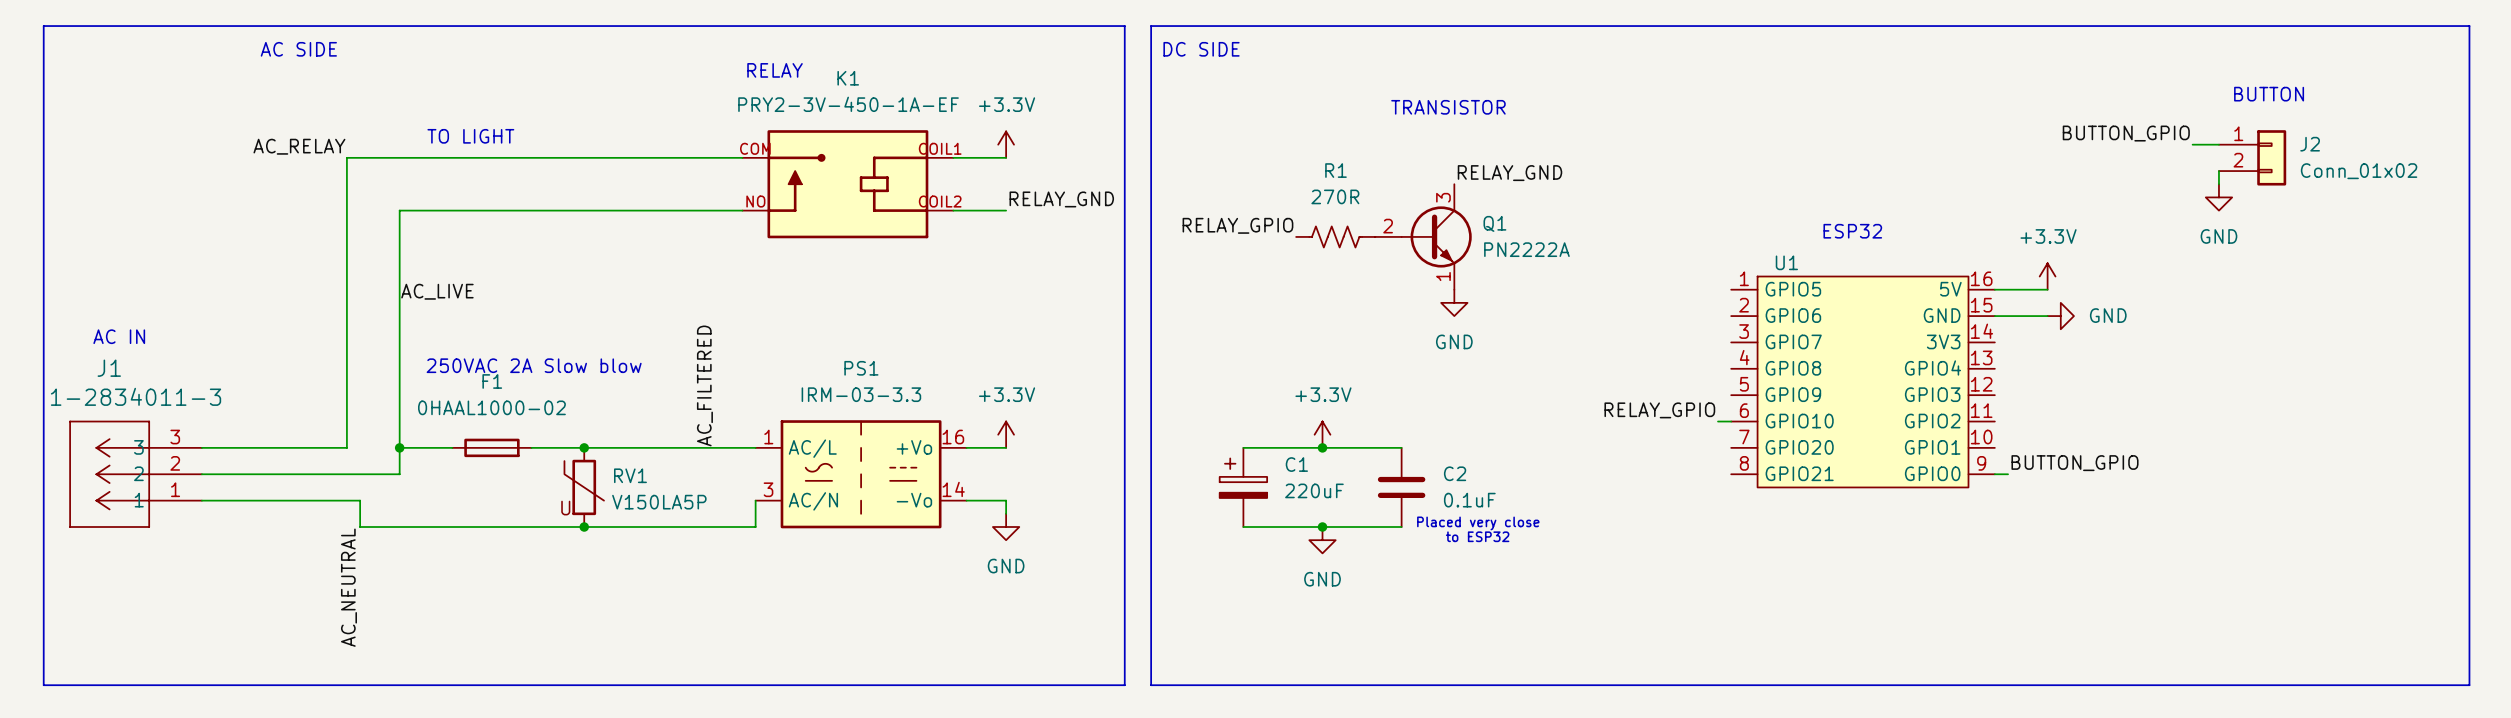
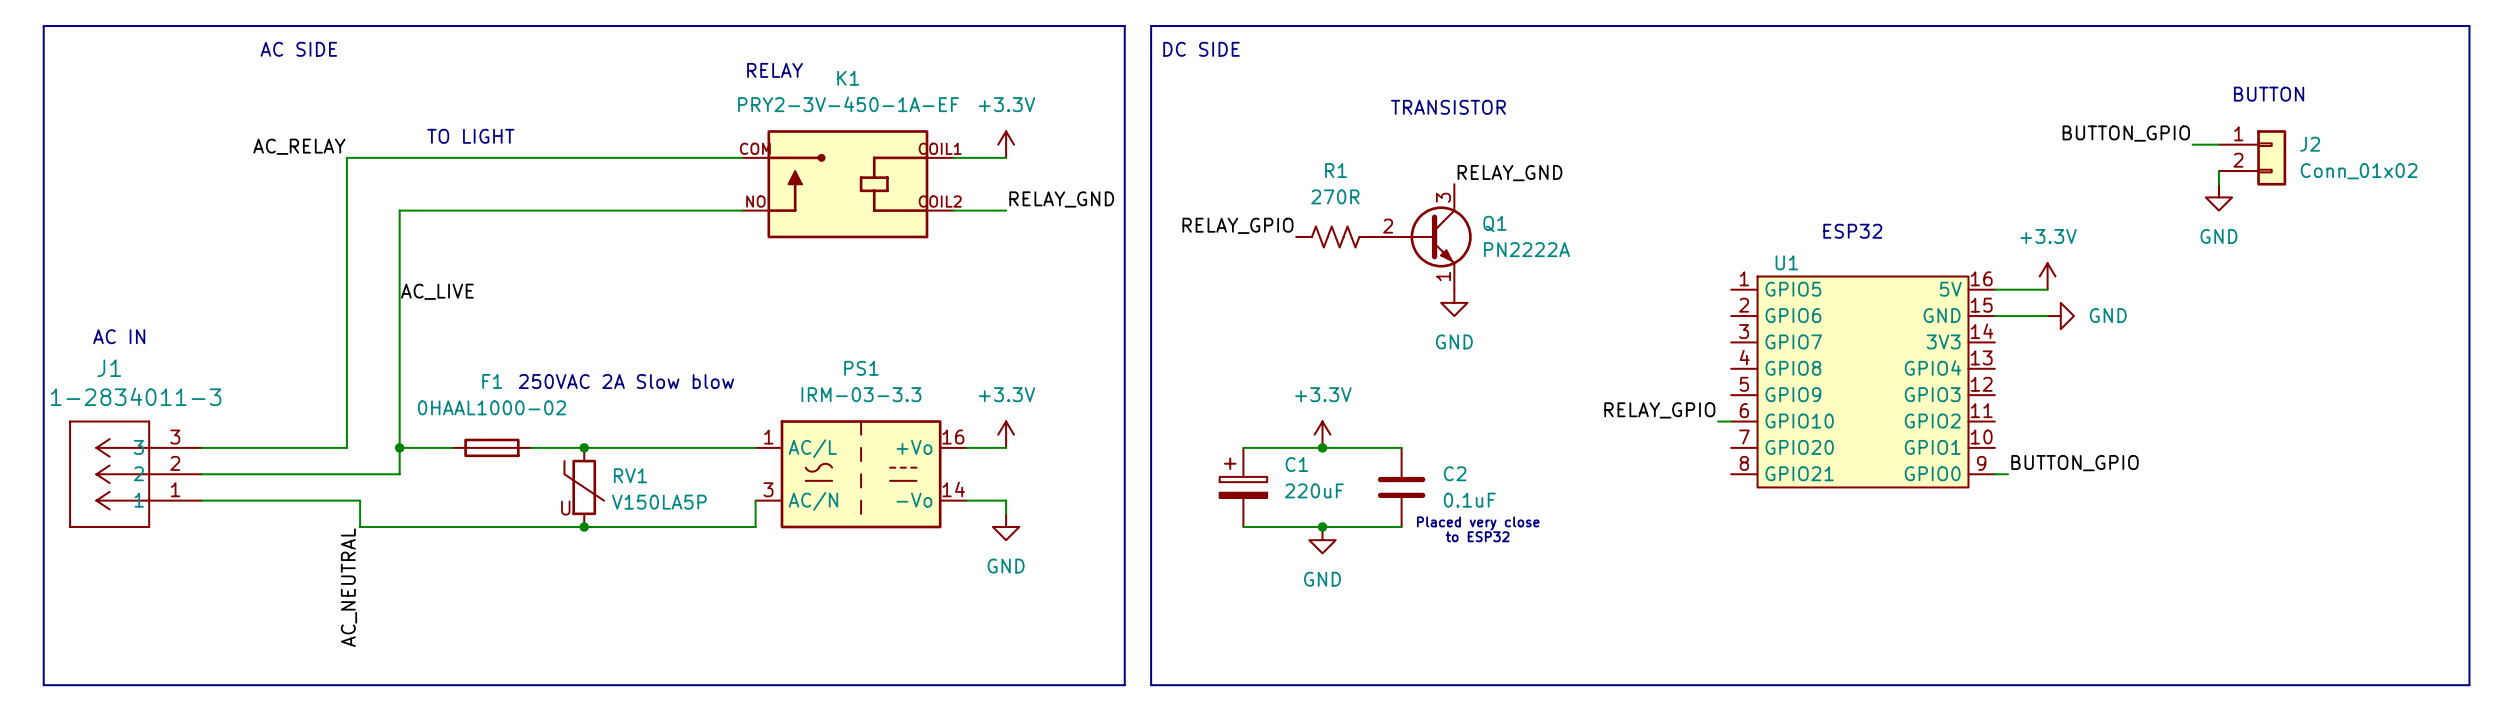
text position: 250VAC 2A Slow blow (534, 365) -> 250VAC 2A Slow blow (626, 381)
label: AC_FILTERED (704, 385) -> none

